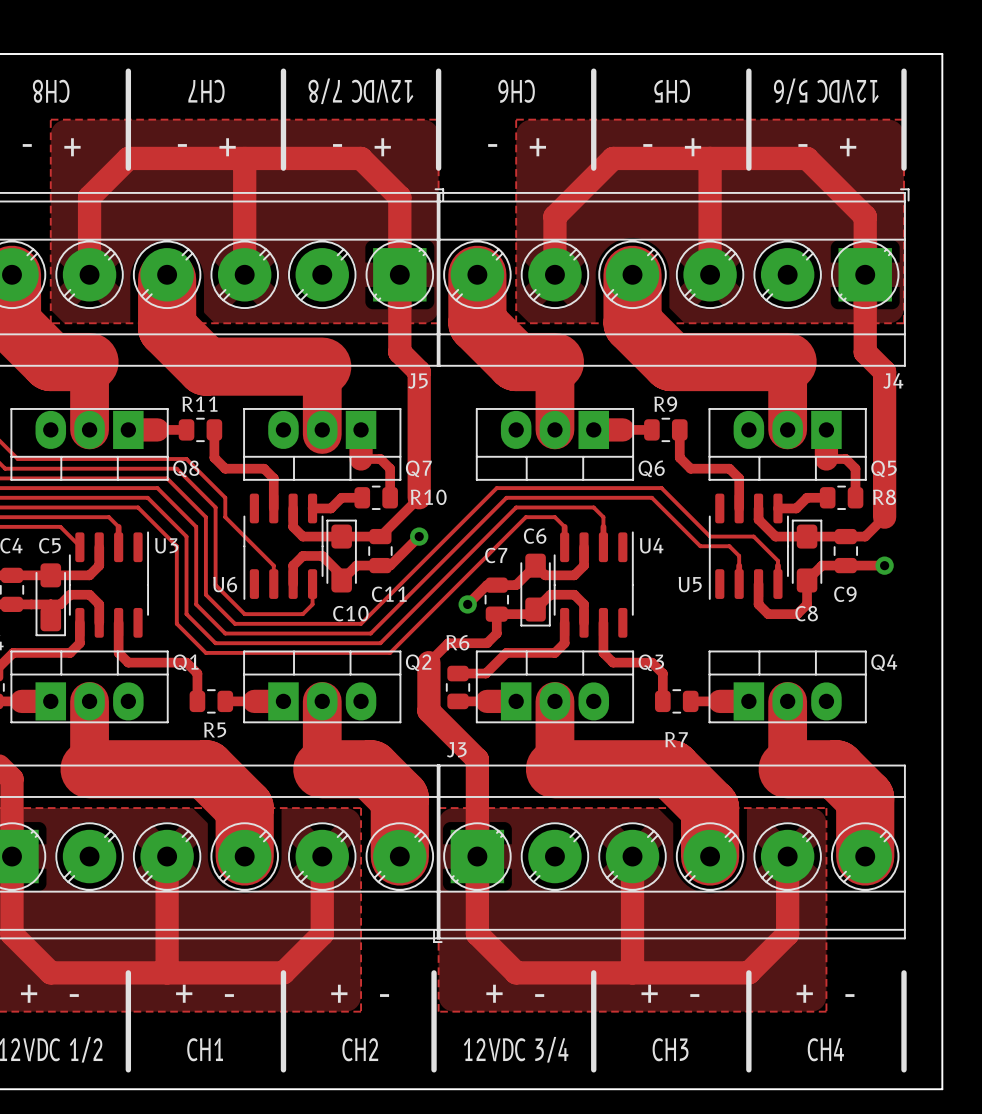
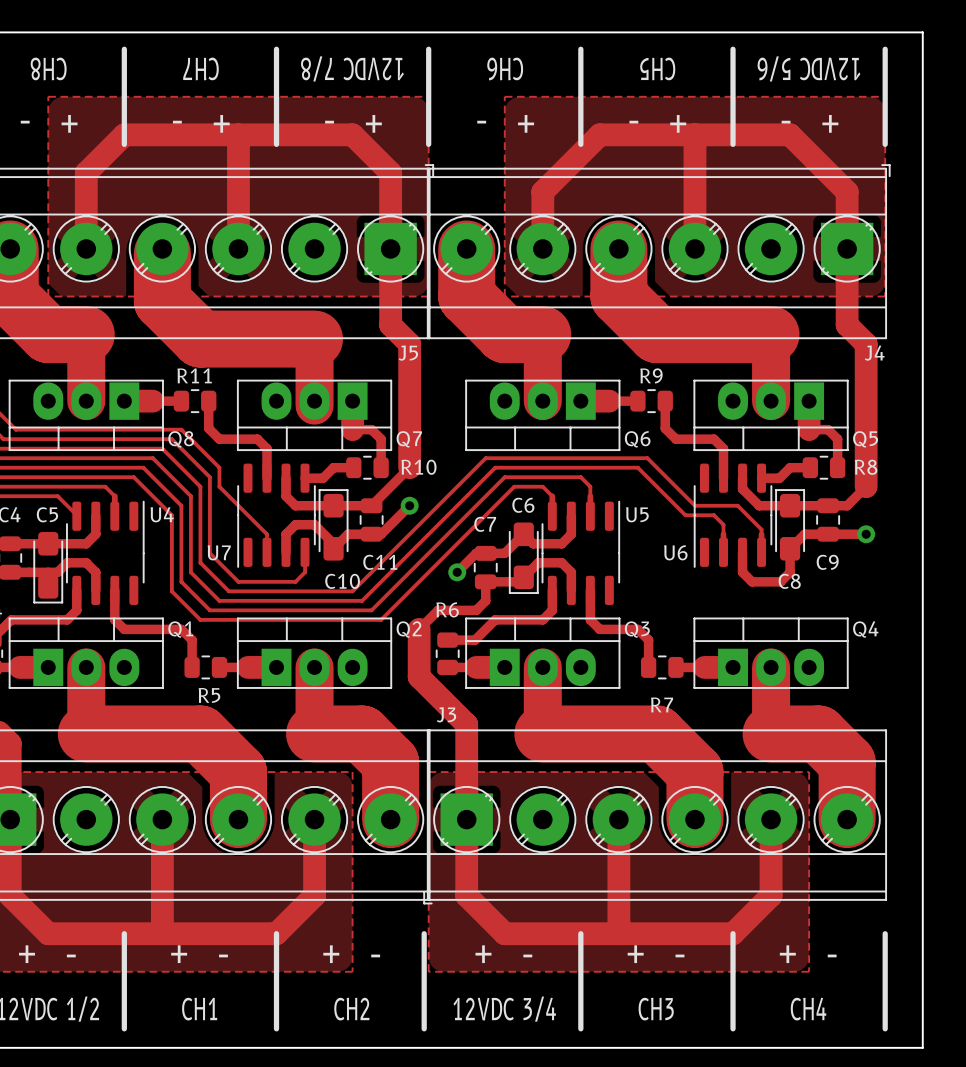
U3 name: U3 (166, 545) -> U4 (162, 514)
U4 name: U4 (651, 545) -> U5 (637, 514)
U6 name: U6 (225, 584) -> U7 (219, 552)
U5 name: U5 (690, 584) -> U6 (675, 552)

